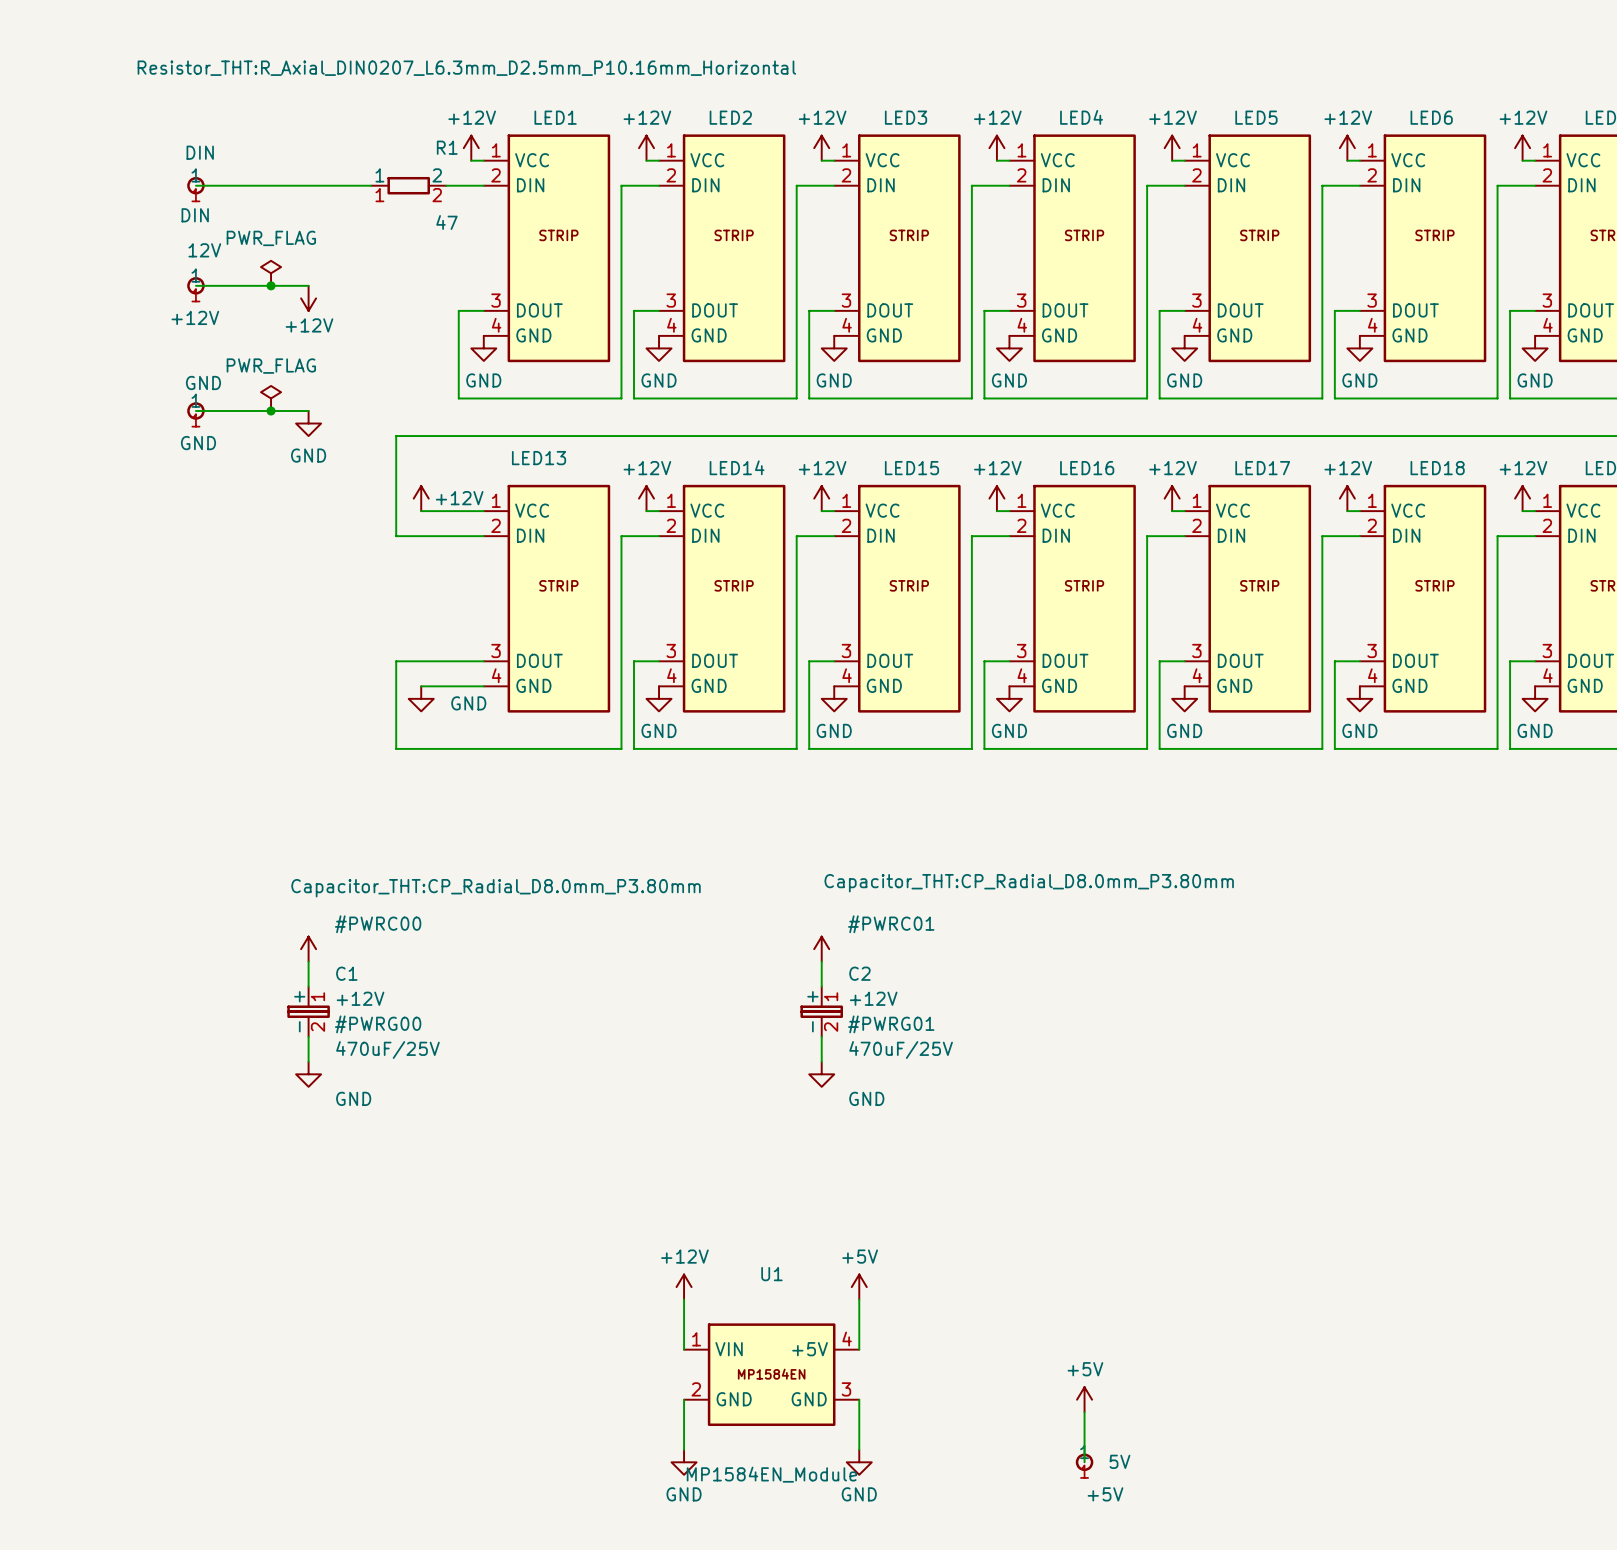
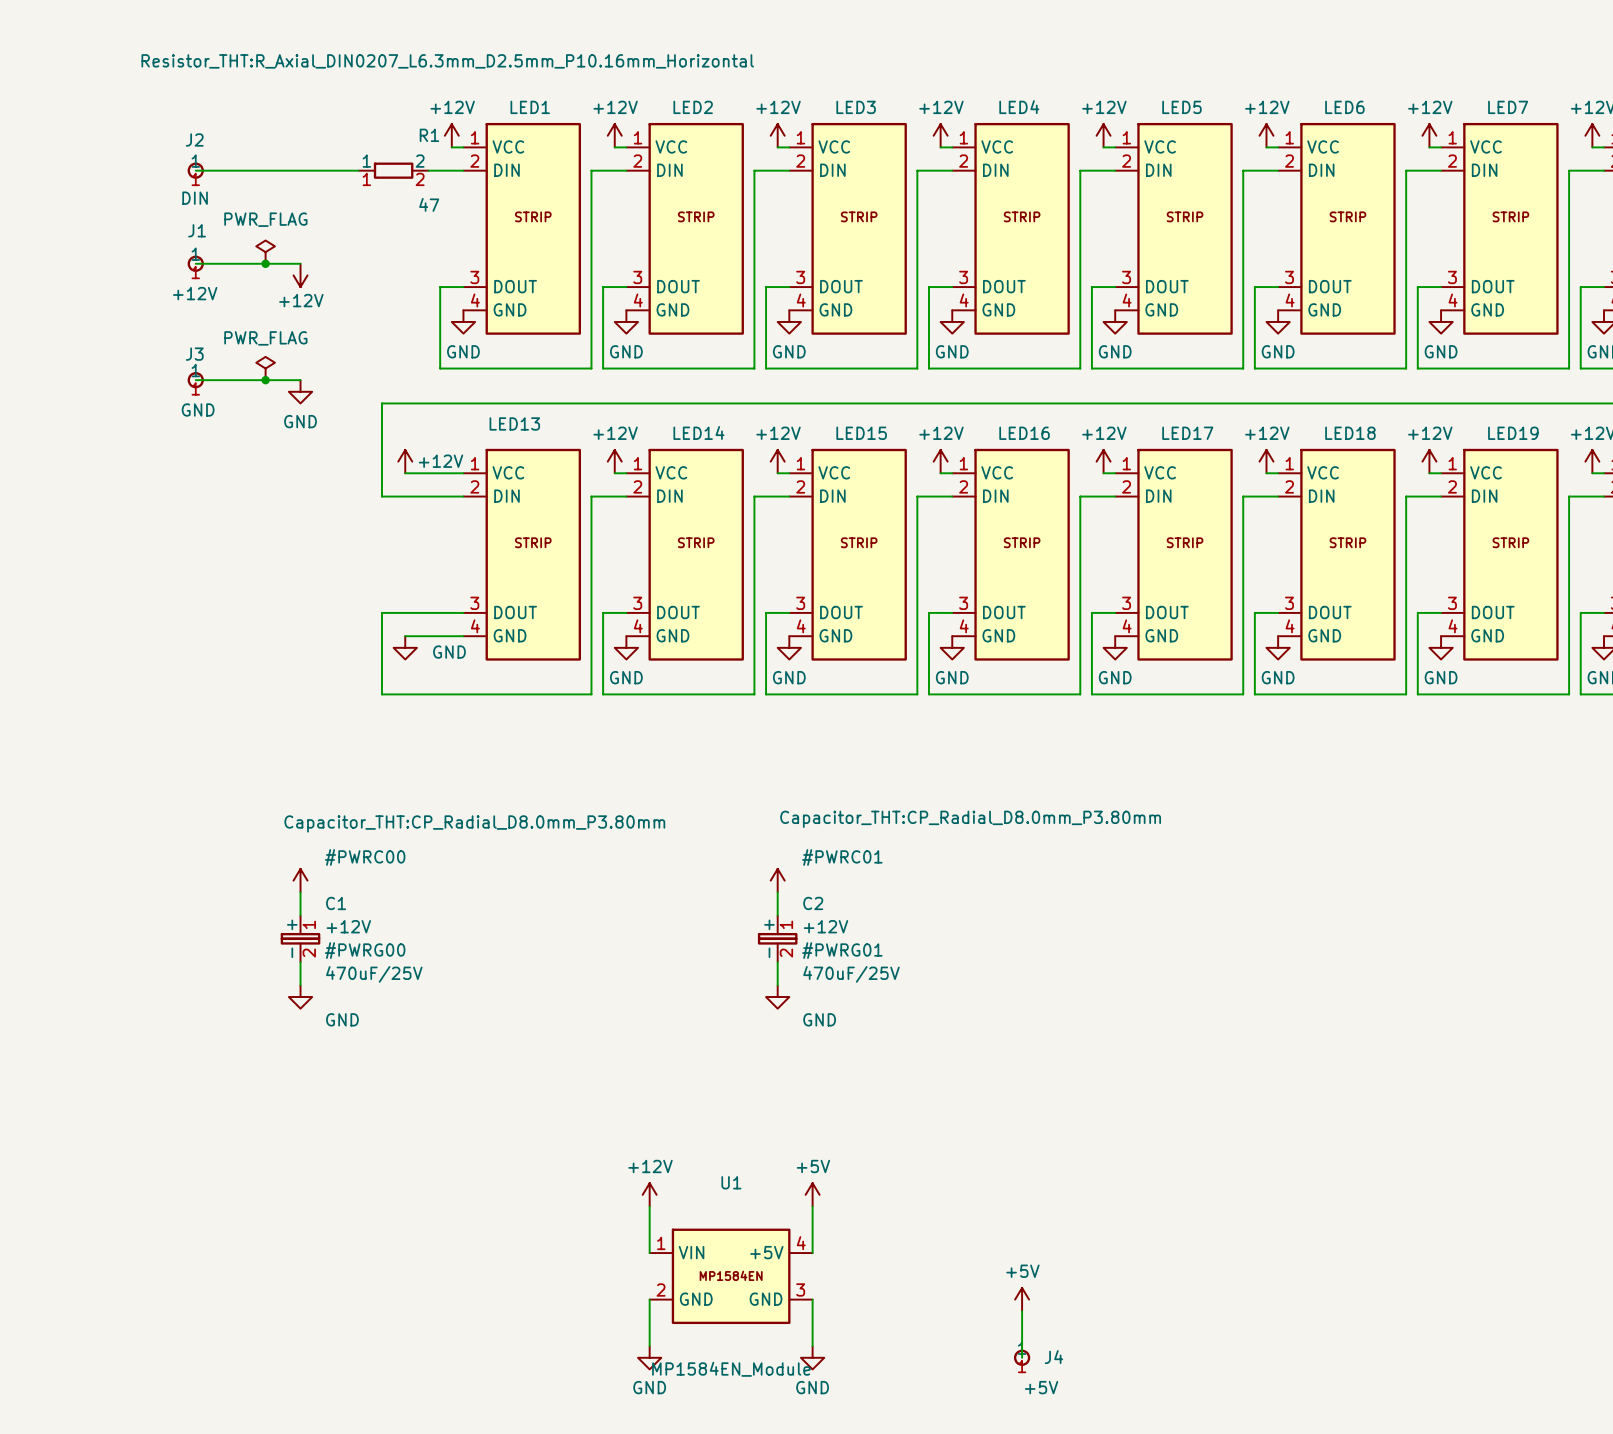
DIN name: DIN (200, 152) -> J2 (194, 139)
12V name: 12V (204, 250) -> J1 (197, 230)
GND name: GND (203, 383) -> J3 (194, 354)
5V name: 5V (1119, 1461) -> J4 (1053, 1357)

